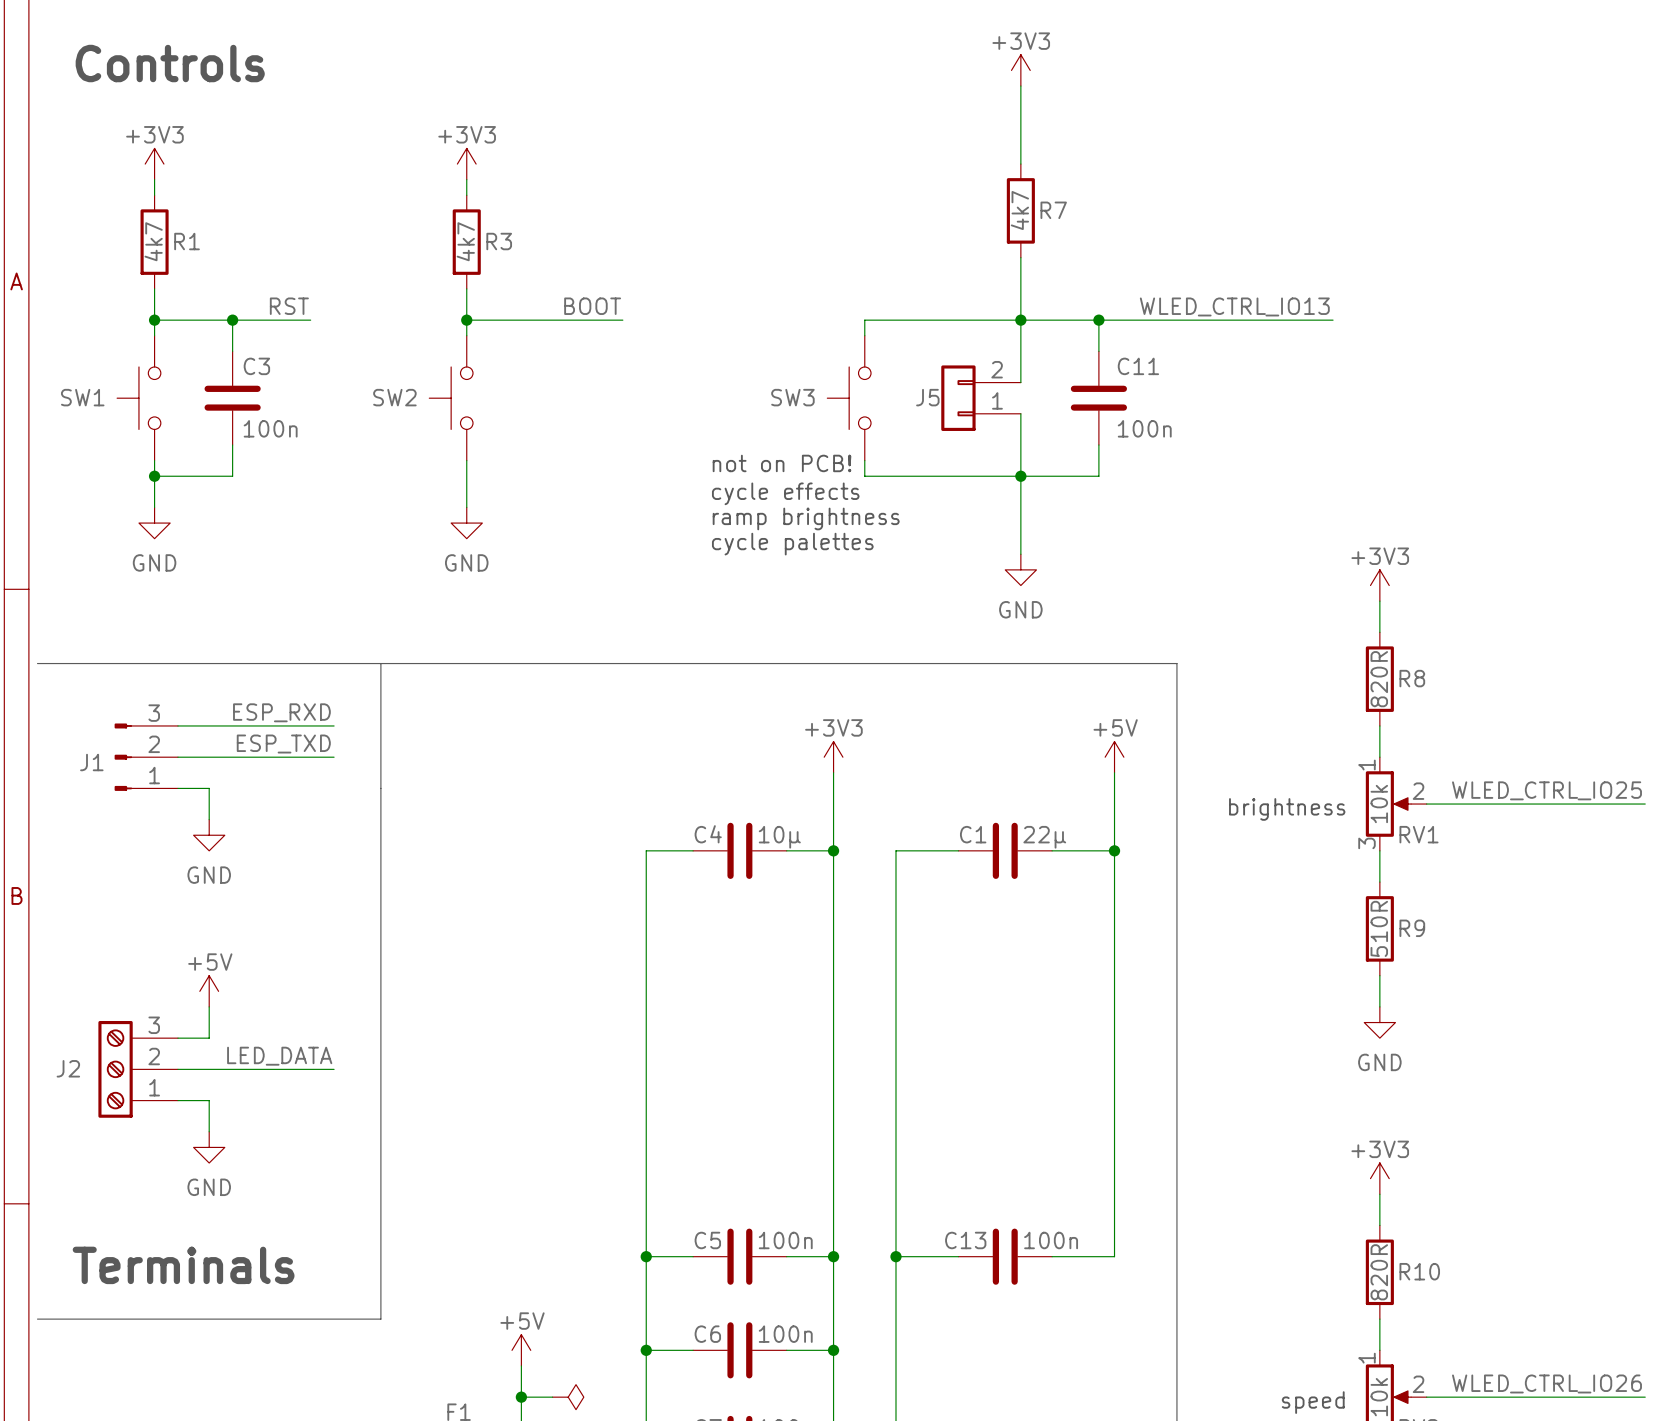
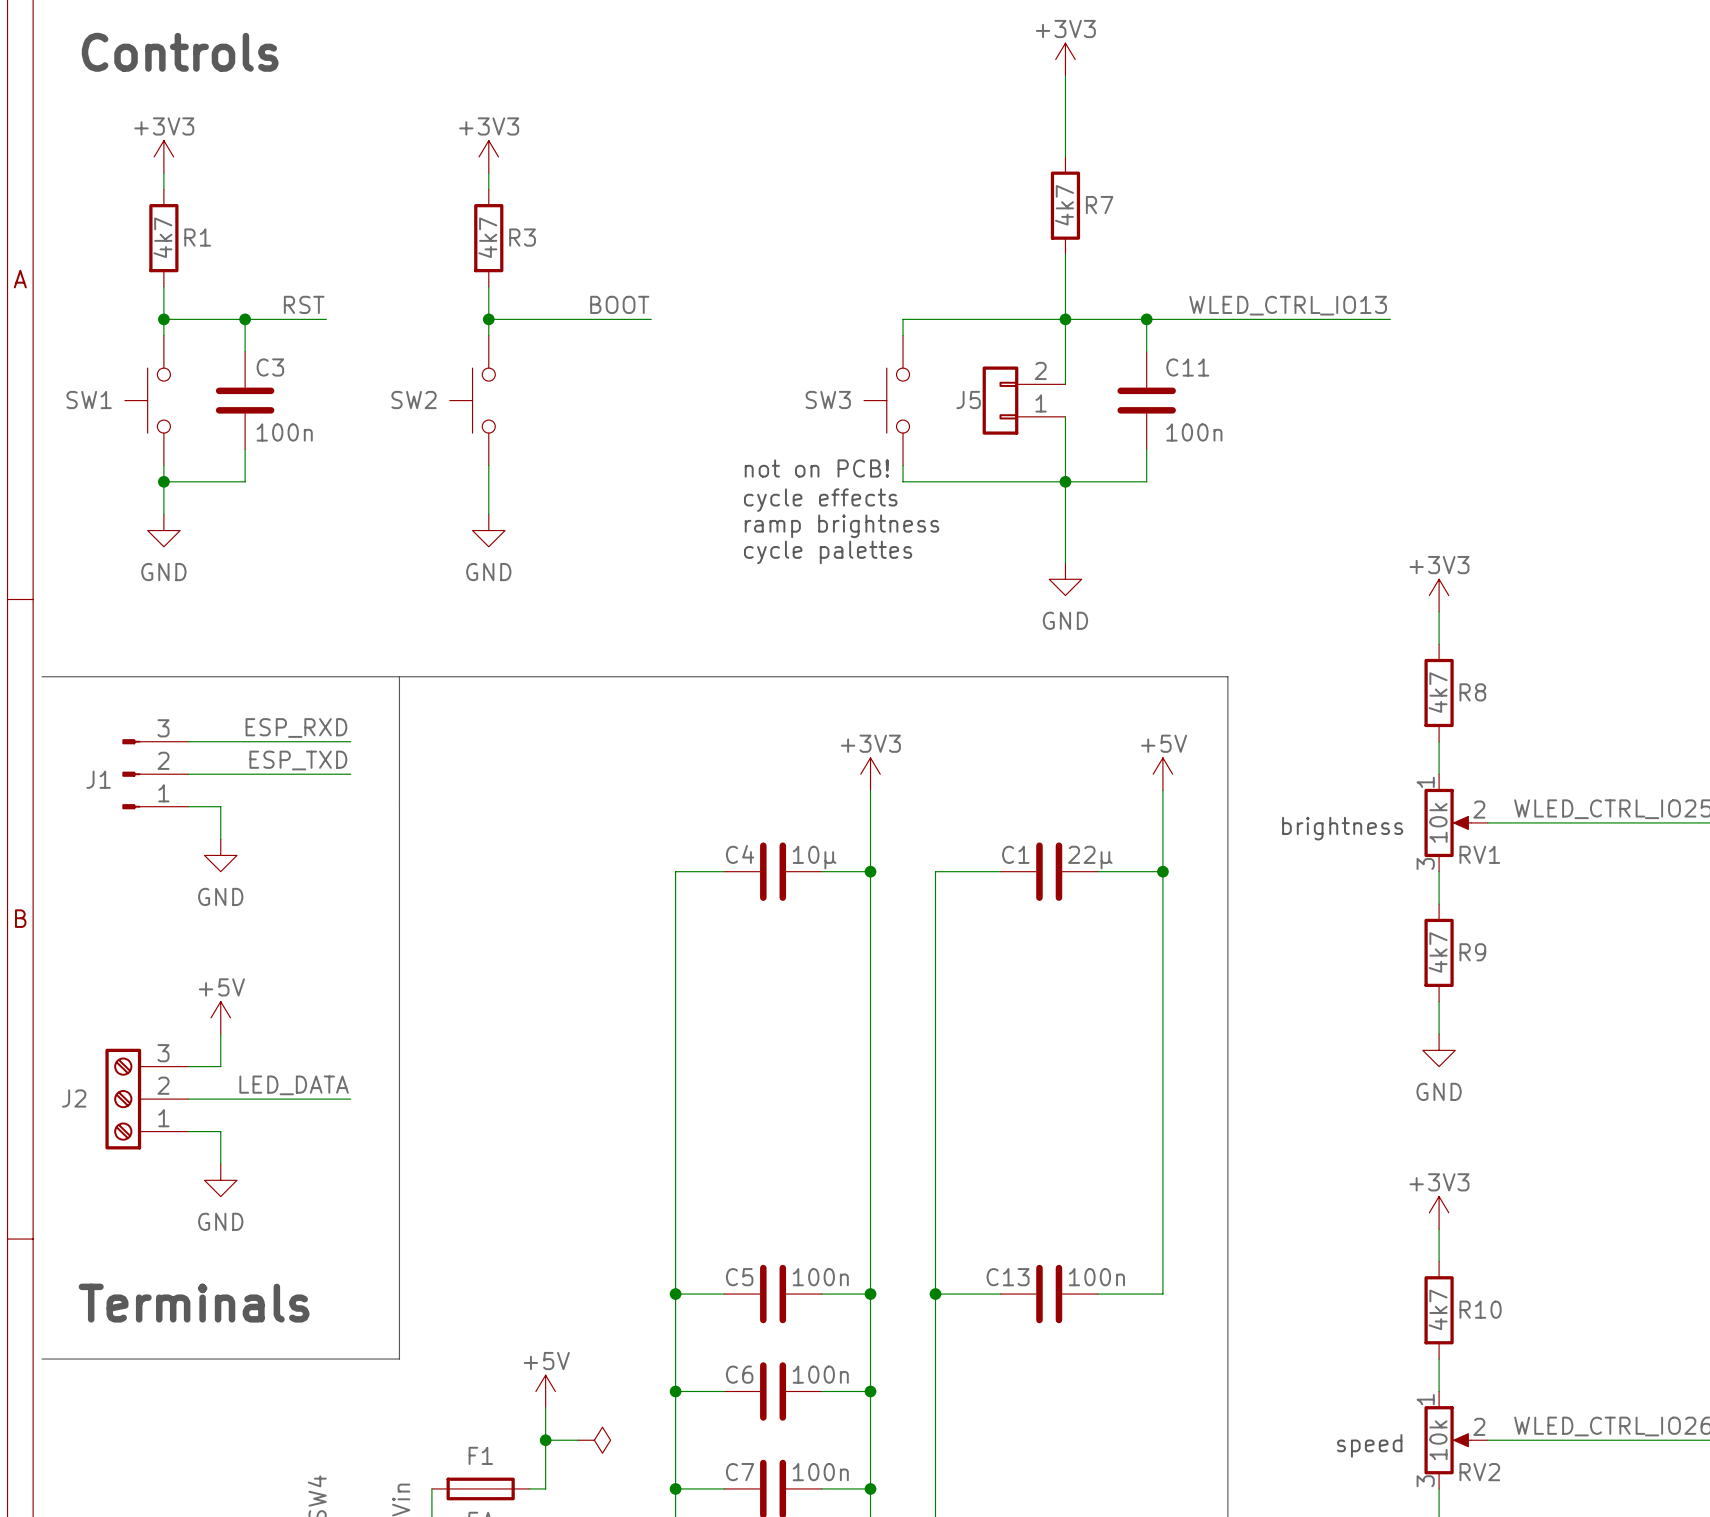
R8 value: 820R (1379, 679) -> 4k7 (1438, 692)
R9 value: 510R (1379, 928) -> 4k7 (1438, 952)
R10 value: 820R (1379, 1272) -> 4k7 (1438, 1309)

